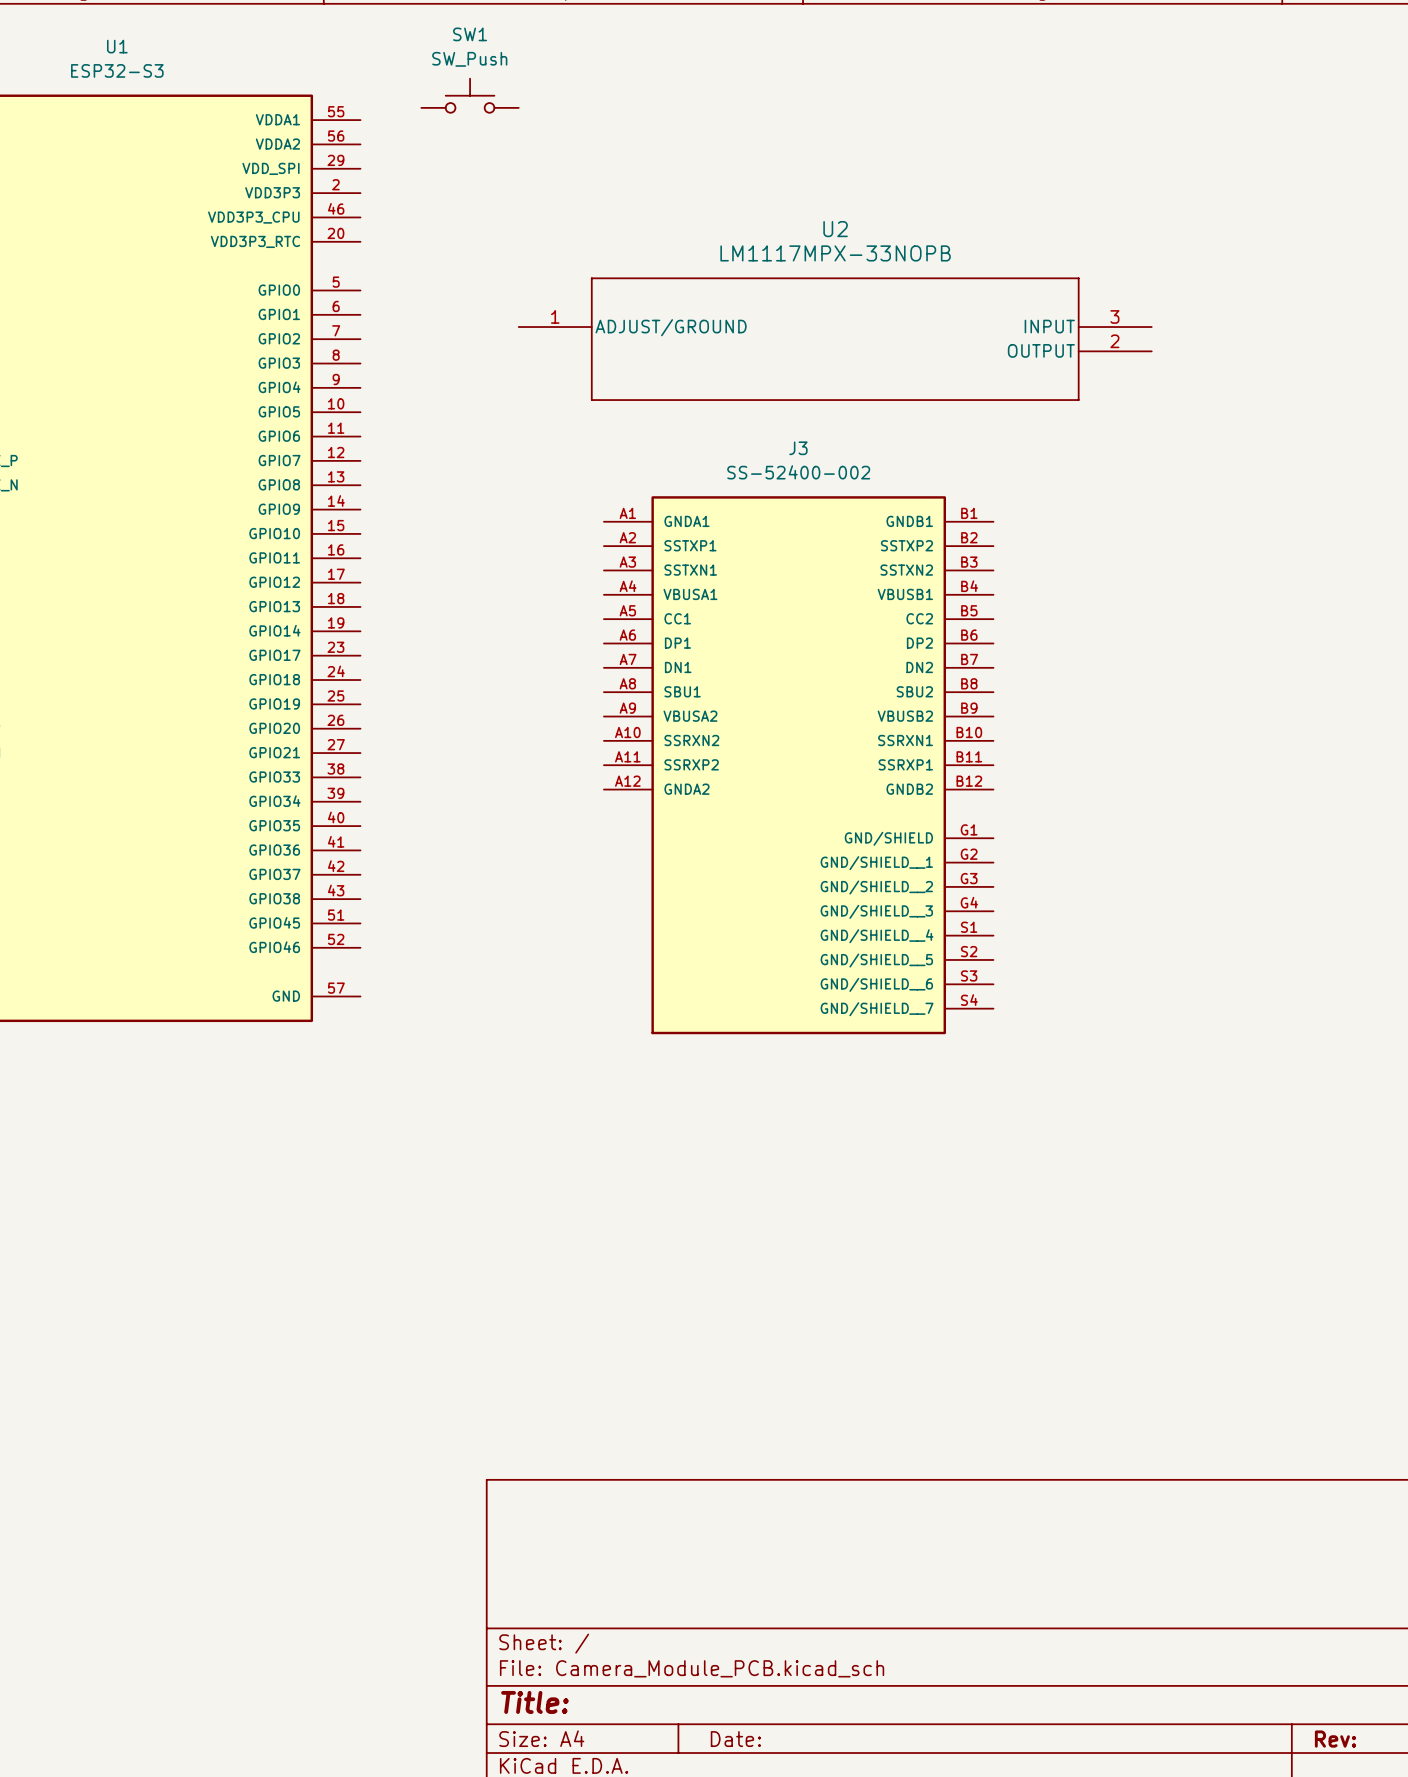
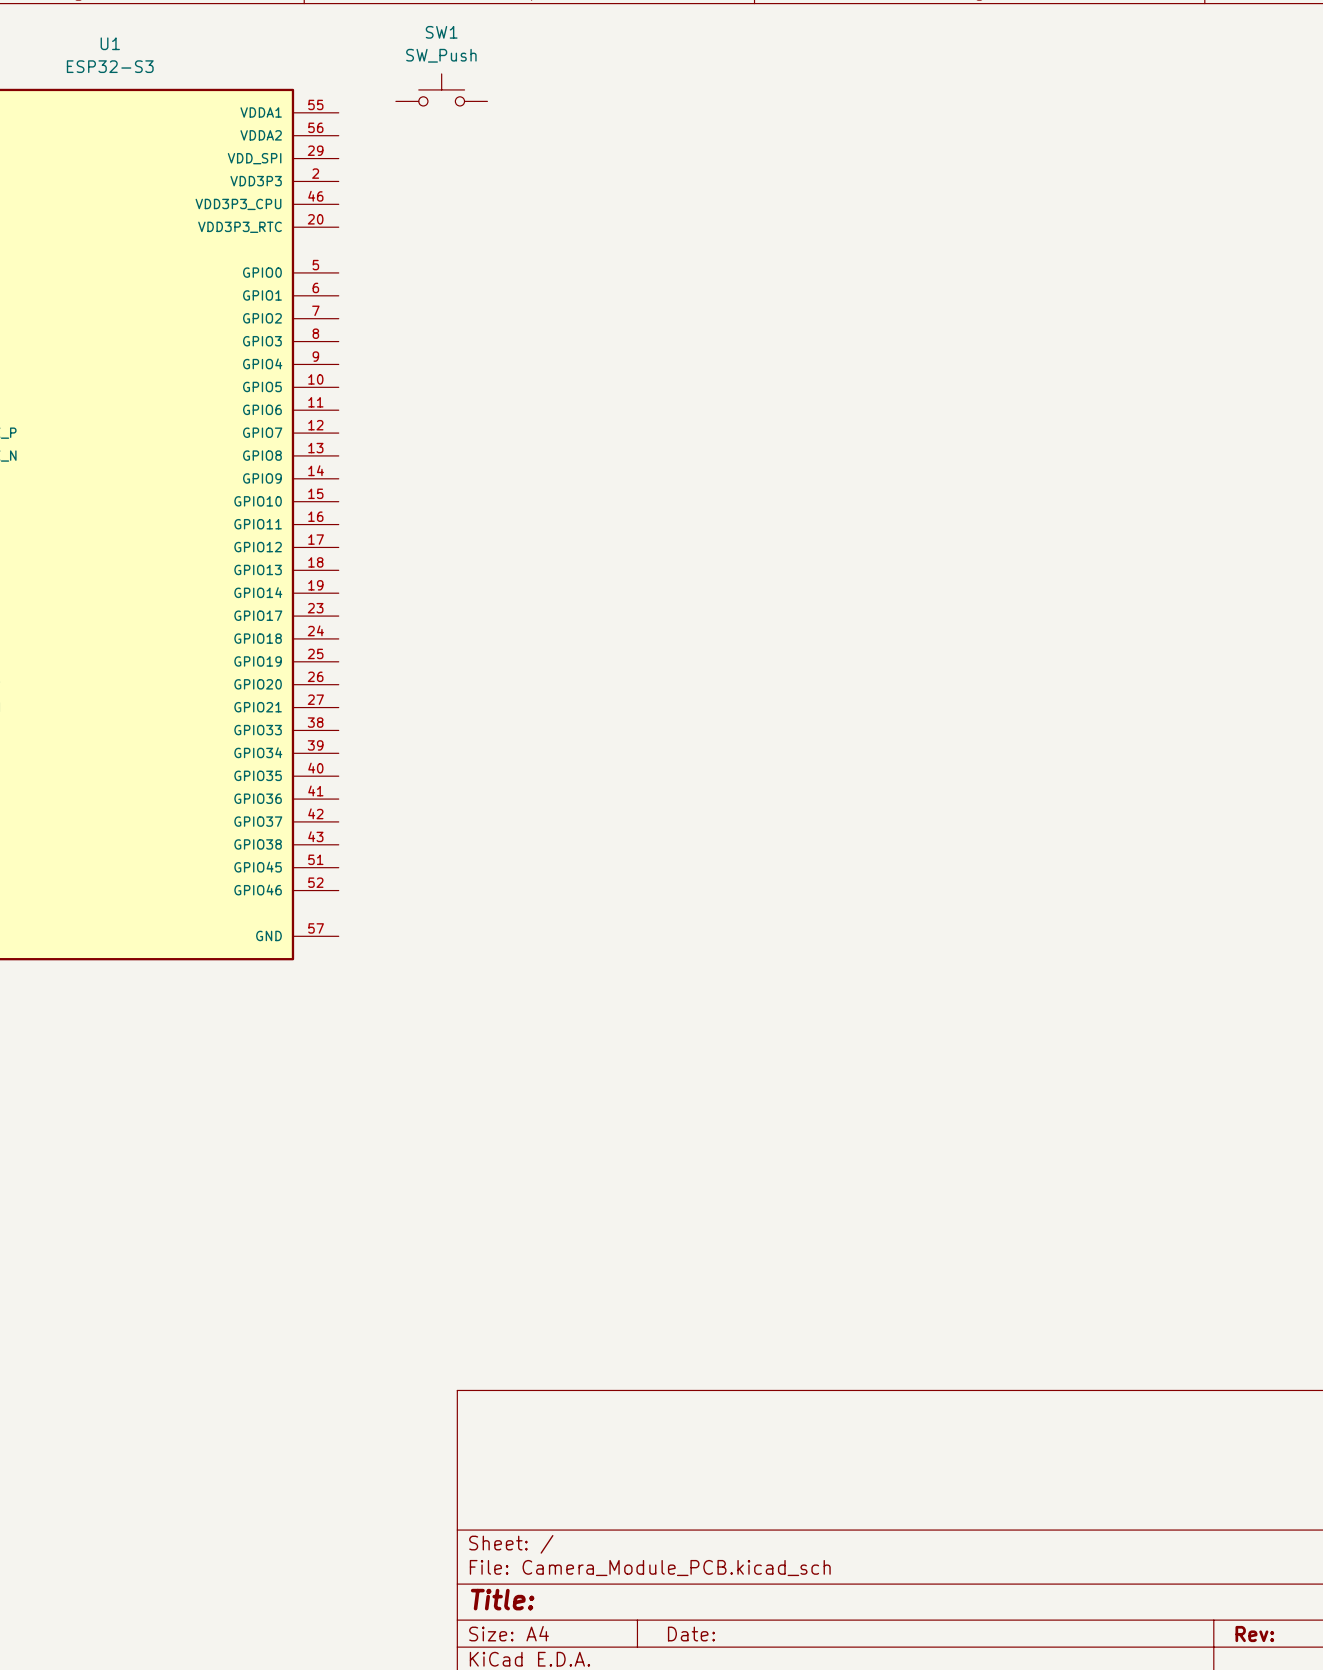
U2: LM1117MPX-33NOPB (835, 339) -> none
J3: SS-52400-002 (798, 765) -> none

